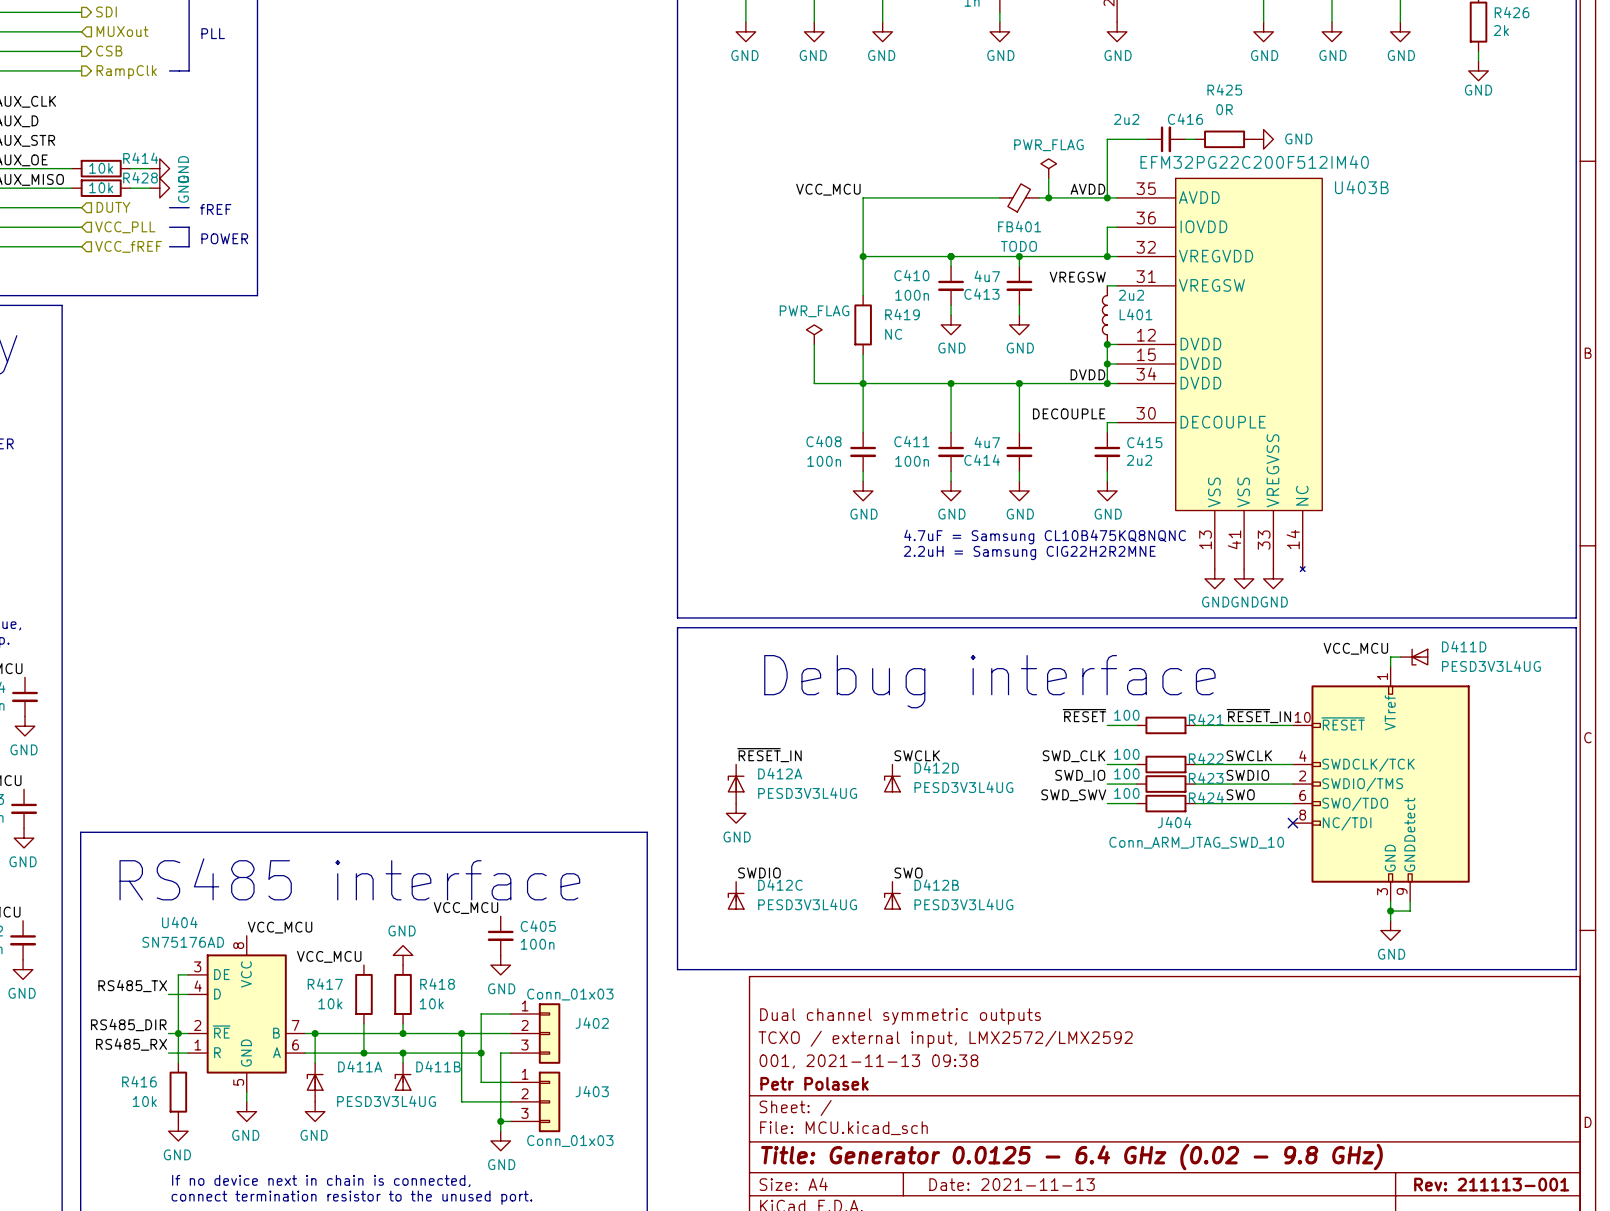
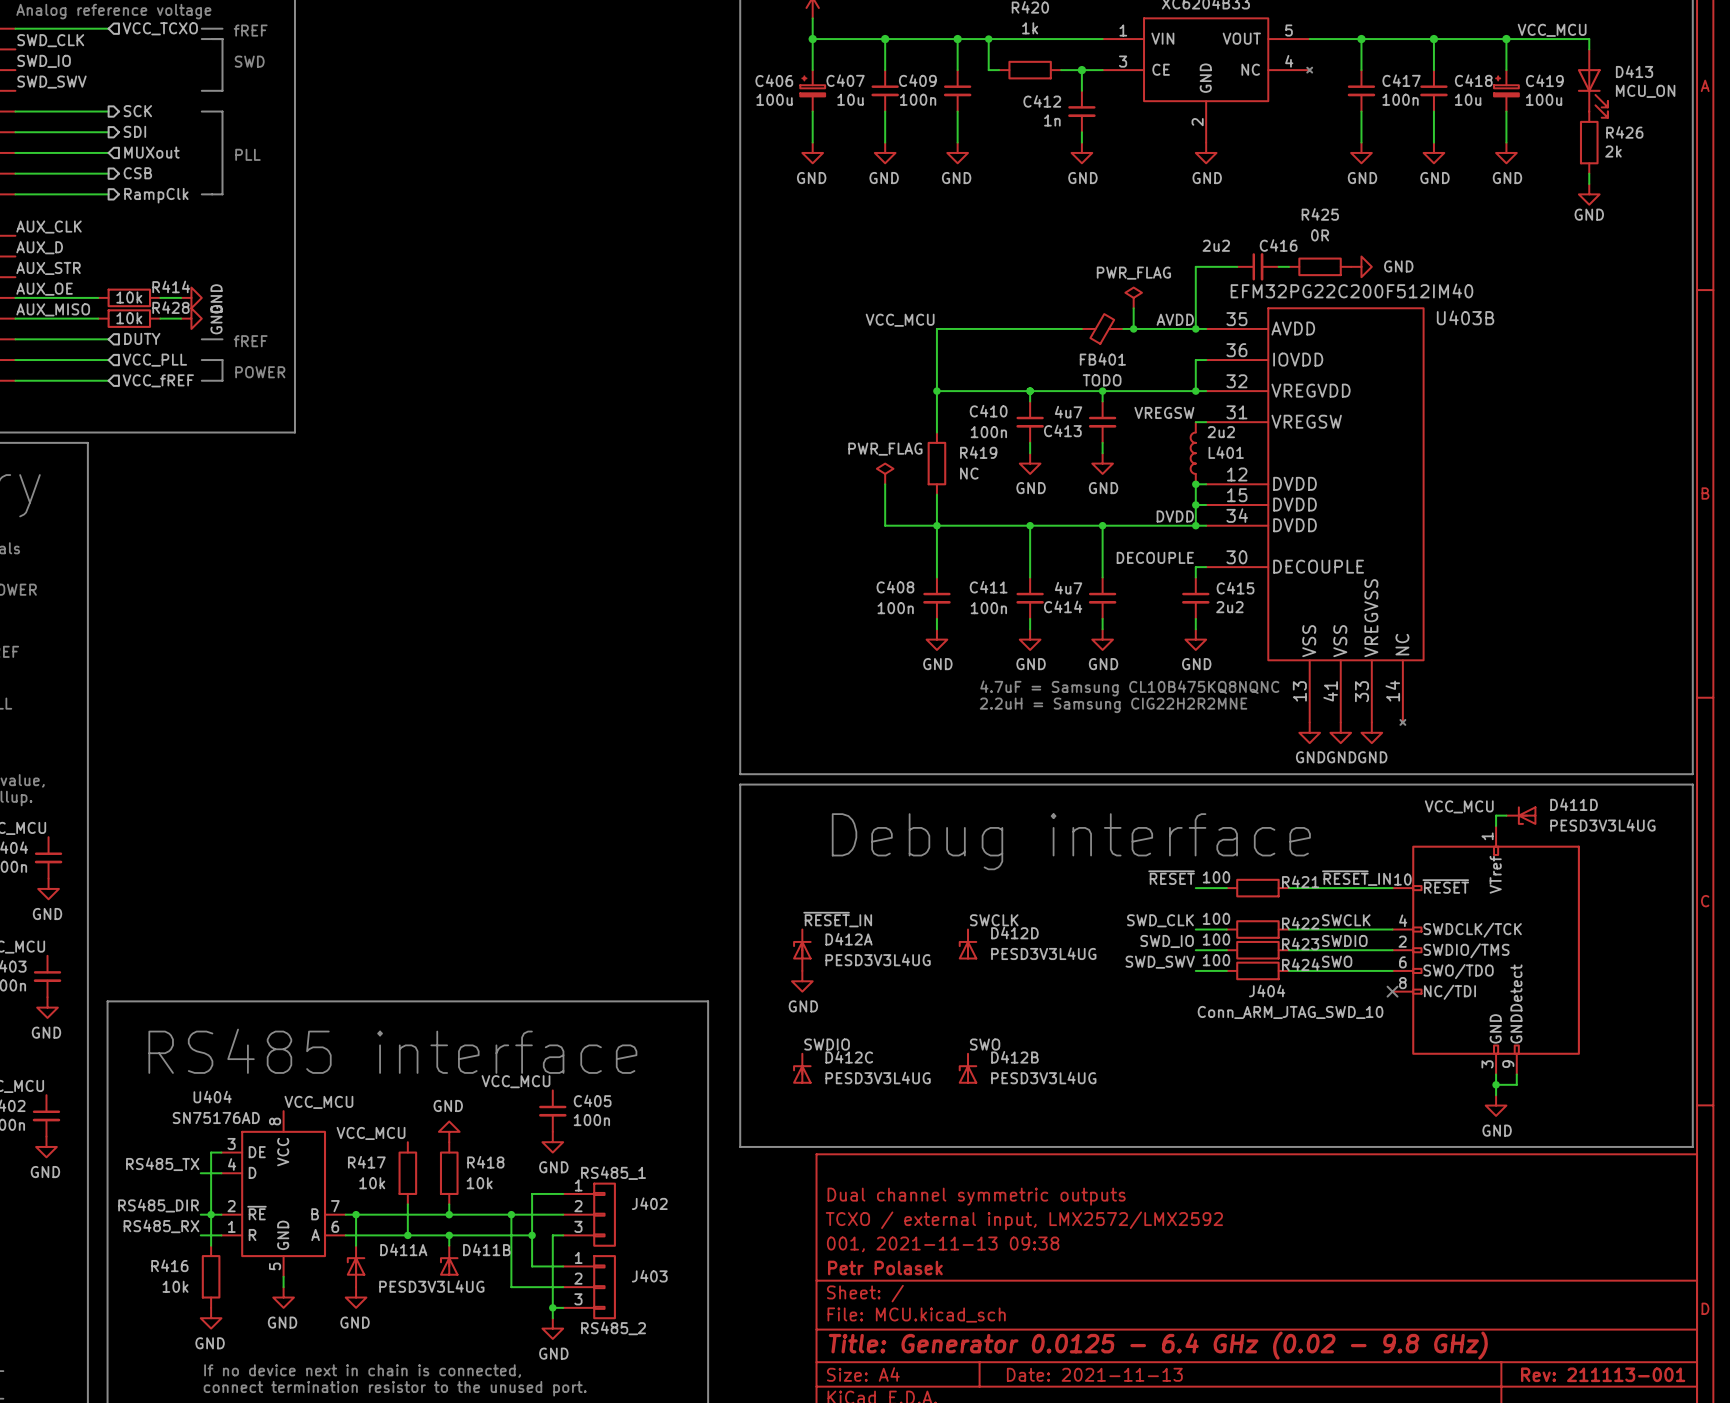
J402 value: Conn_01x03 (570, 994) -> RS485_1 (613, 1173)
J403 value: Conn_01x03 (570, 1141) -> RS485_2 (613, 1328)

